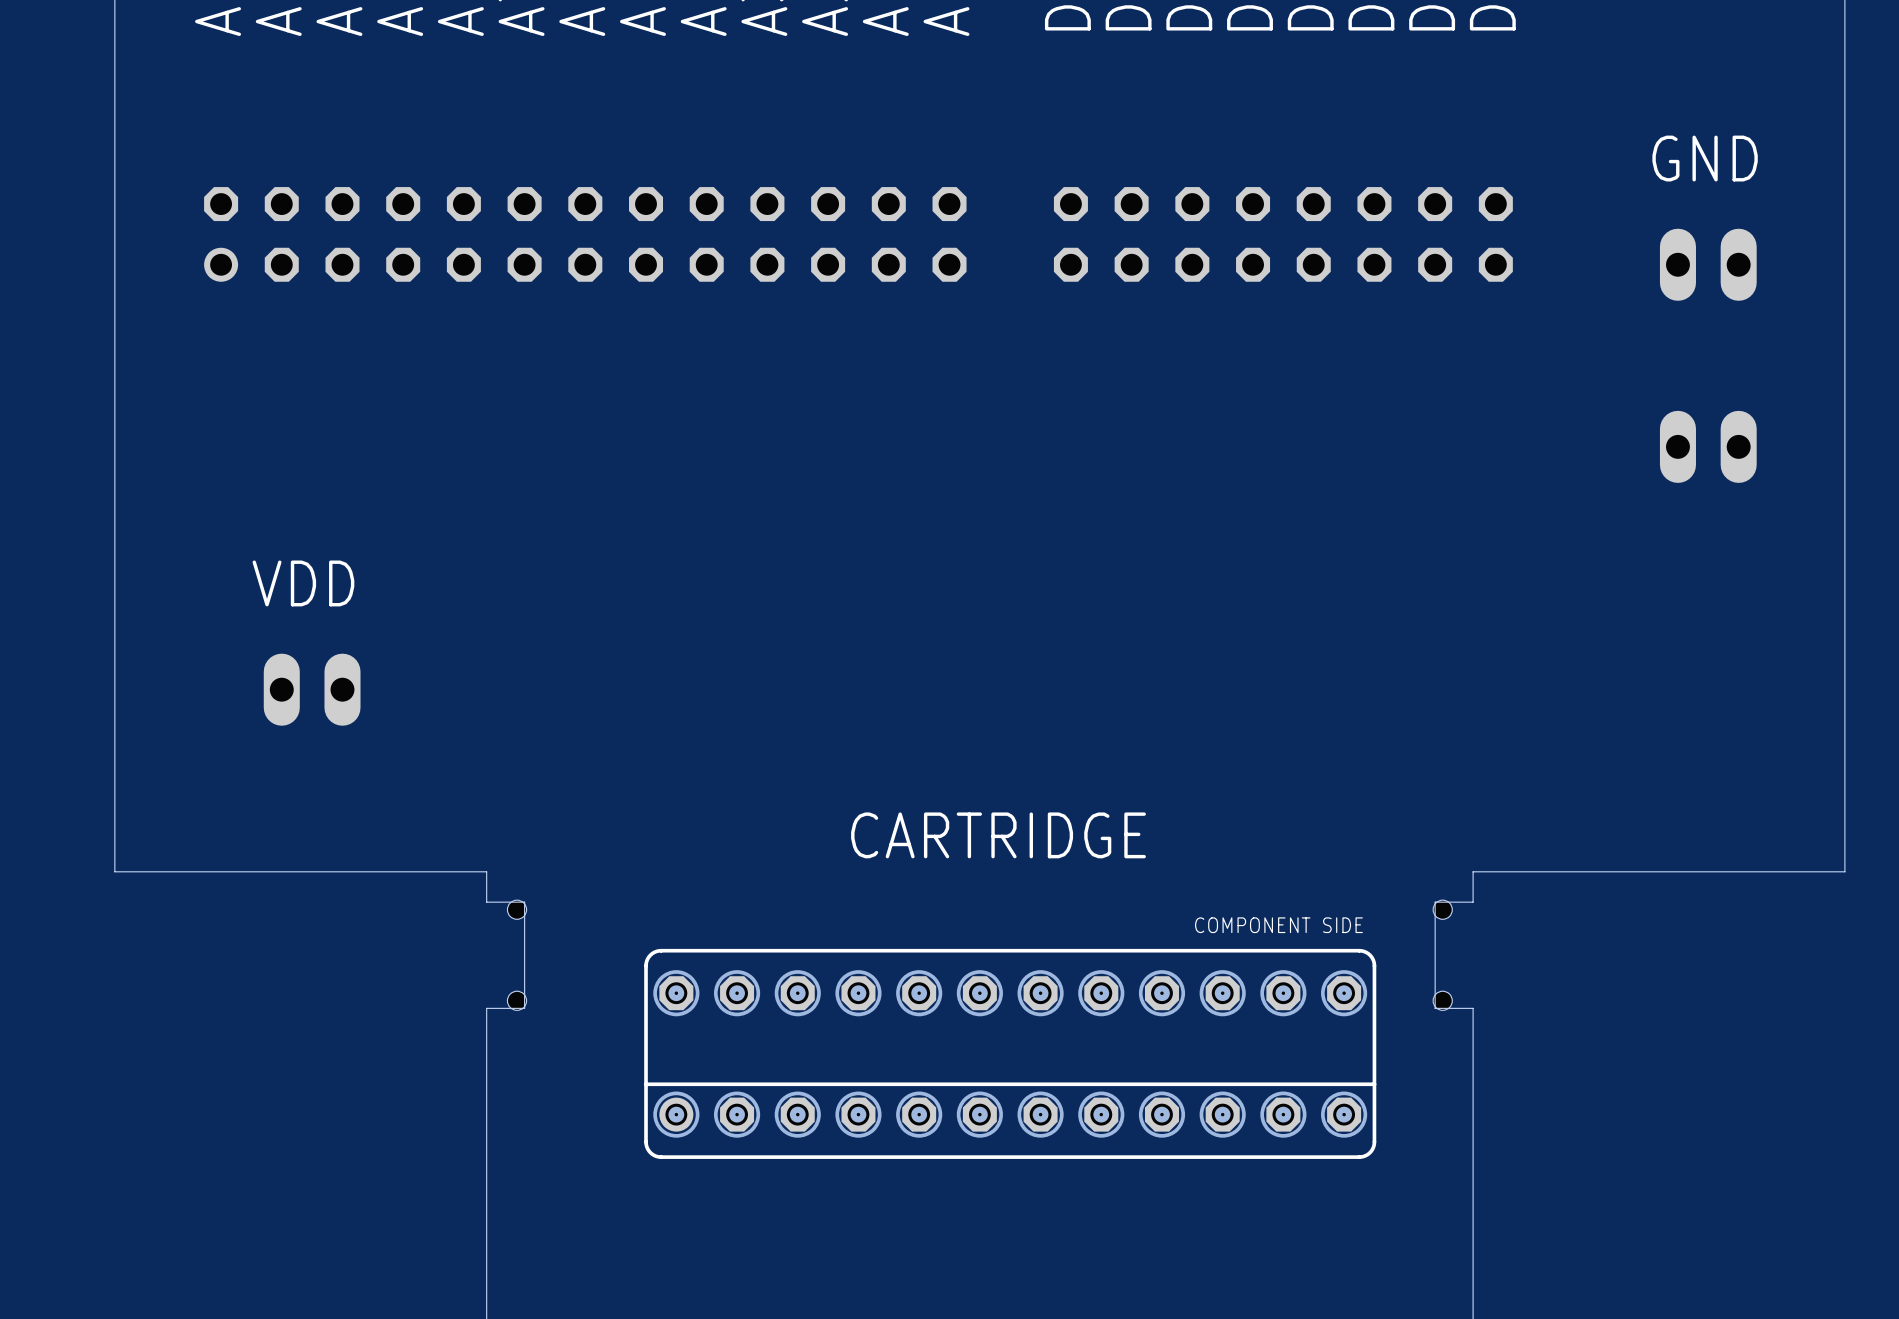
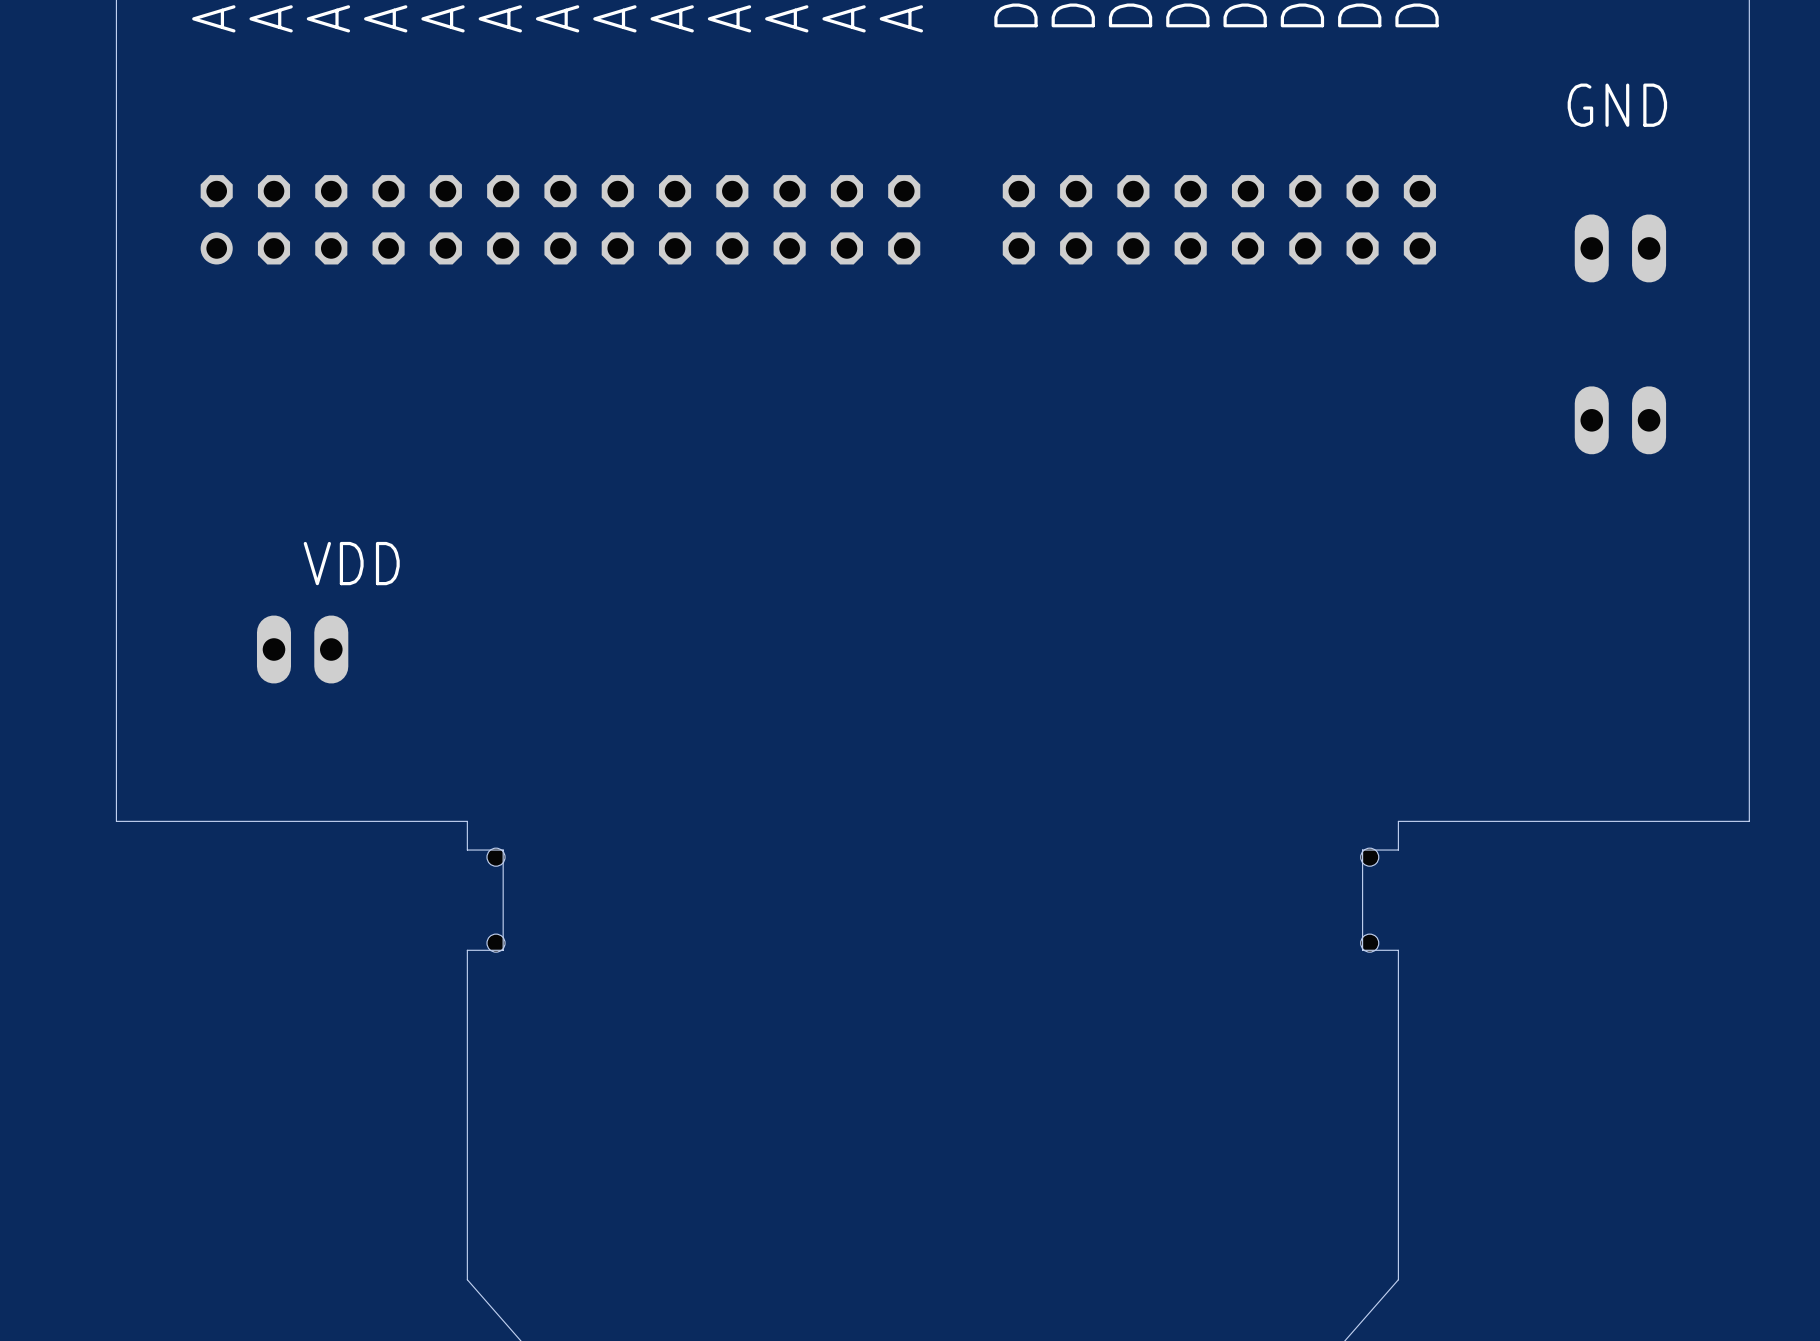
text position: GND (1705, 158) -> GND (1617, 105)
text position: VDD (303, 583) -> VDD (351, 563)
text: CARTRIDGE (998, 835) -> none
part: (1010, 1053) -> none

